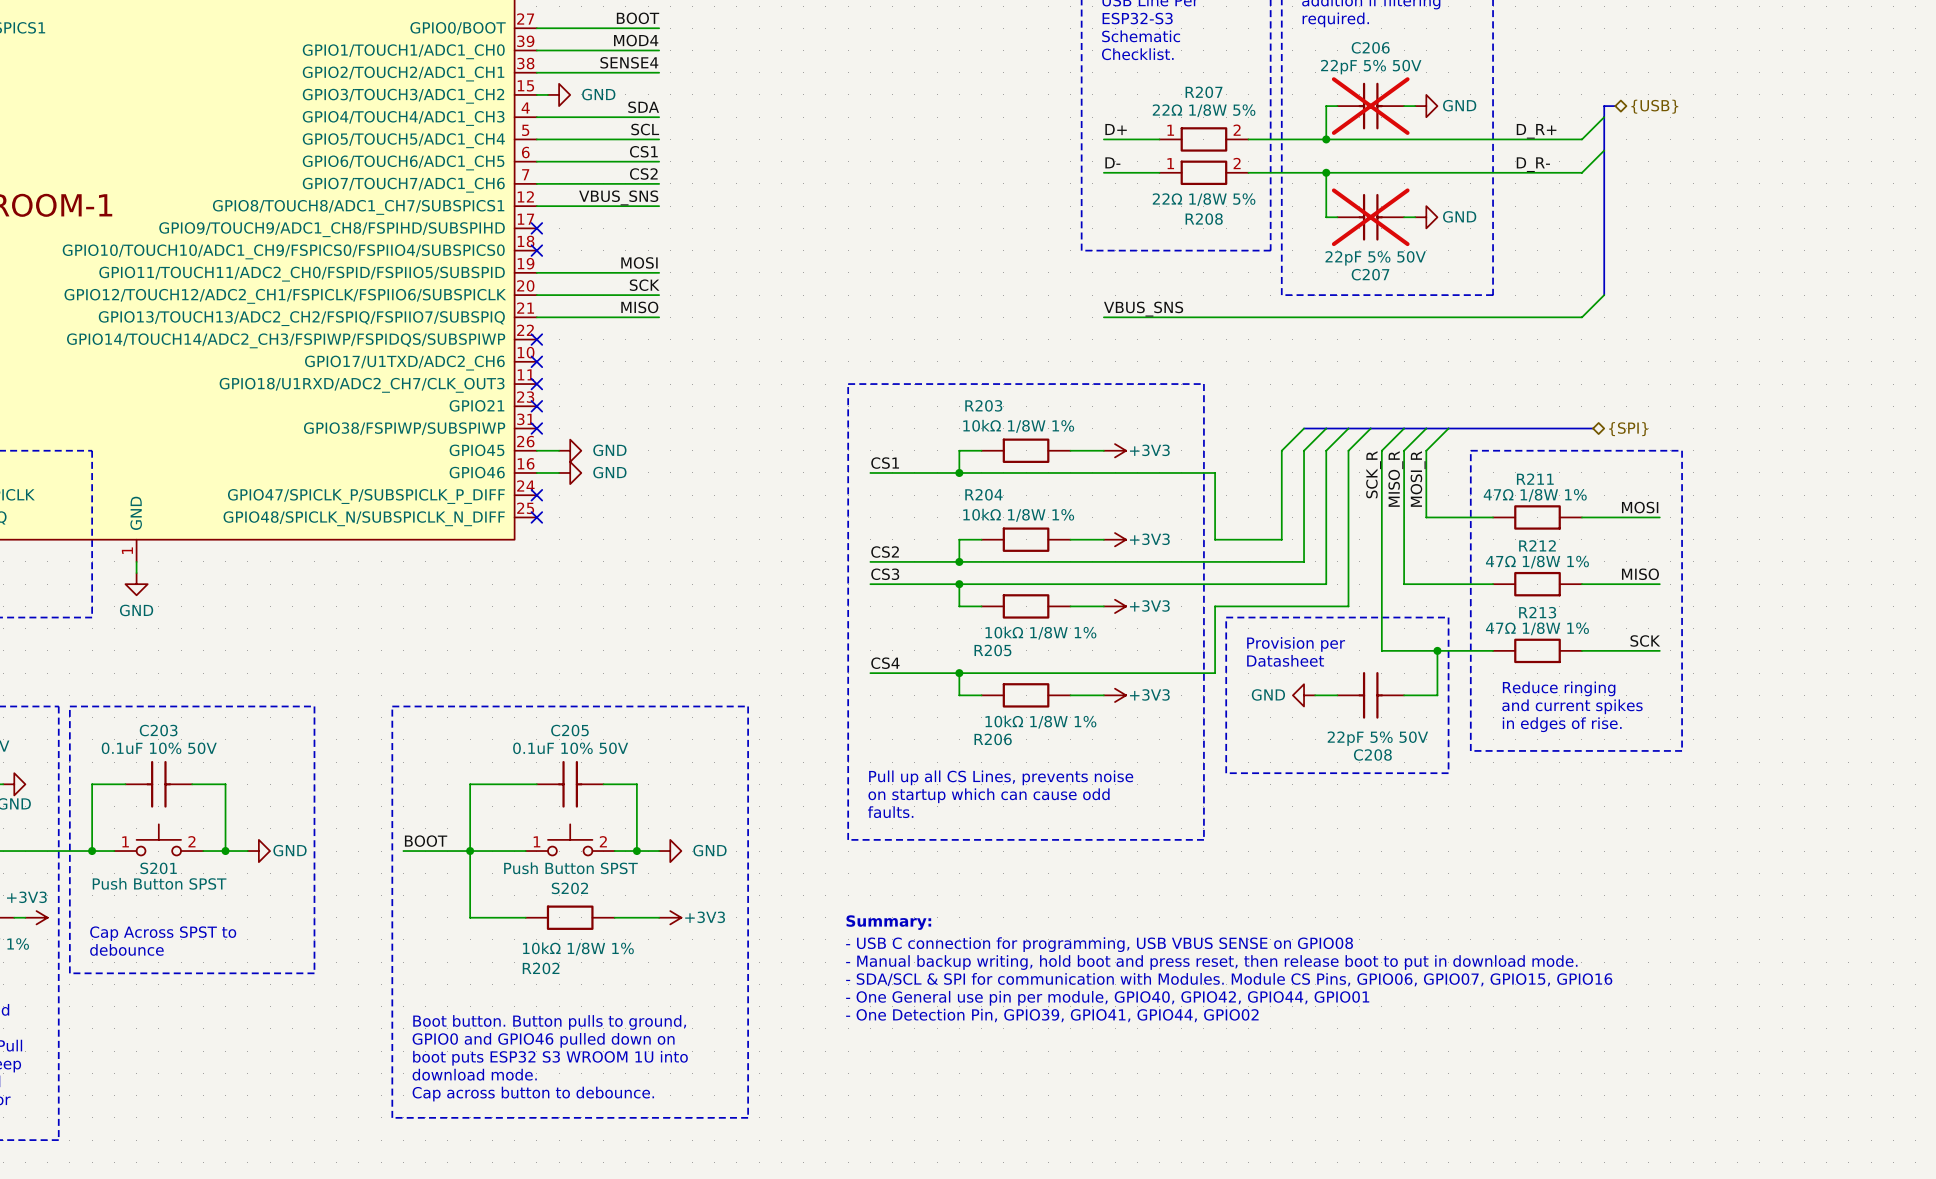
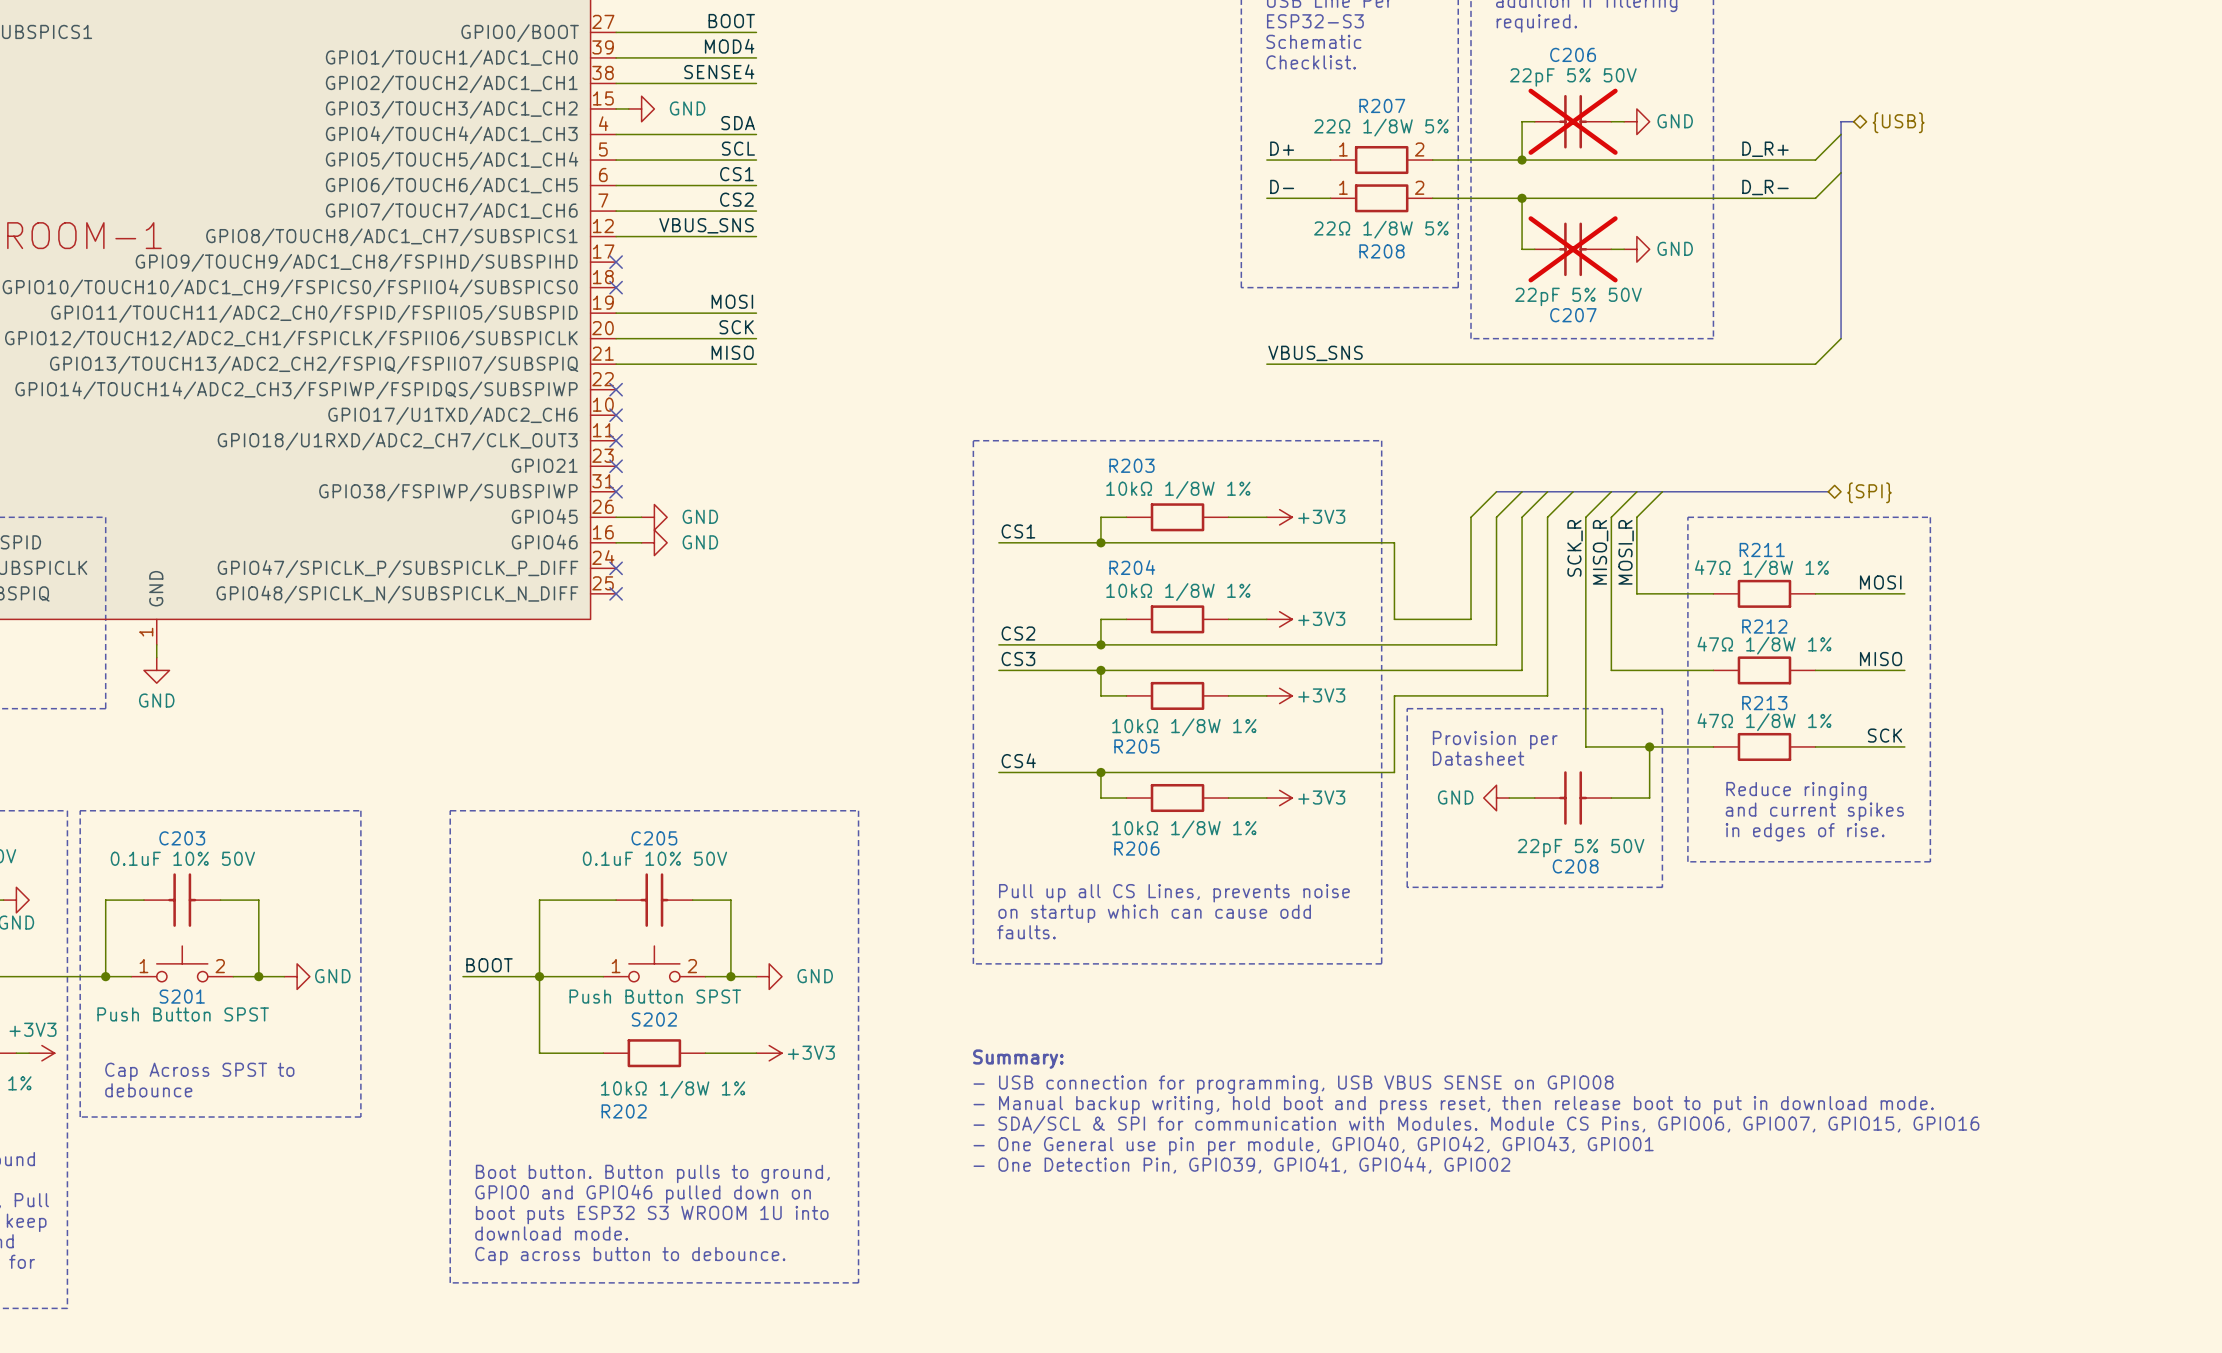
text: - USB C connection for programming, USB VBUS SENSE on GPIO08 (1099, 944) -> - USB connection for programming, USB VBUS SENSE on GPIO08 (1293, 1084)
text: - One General use pin per module, GPIO40, GPIO42, GPIO44, GPIO01 (1107, 998) -> - One General use pin per module, GPIO40, GPIO42, GPIO43, GPIO01 (1313, 1145)

